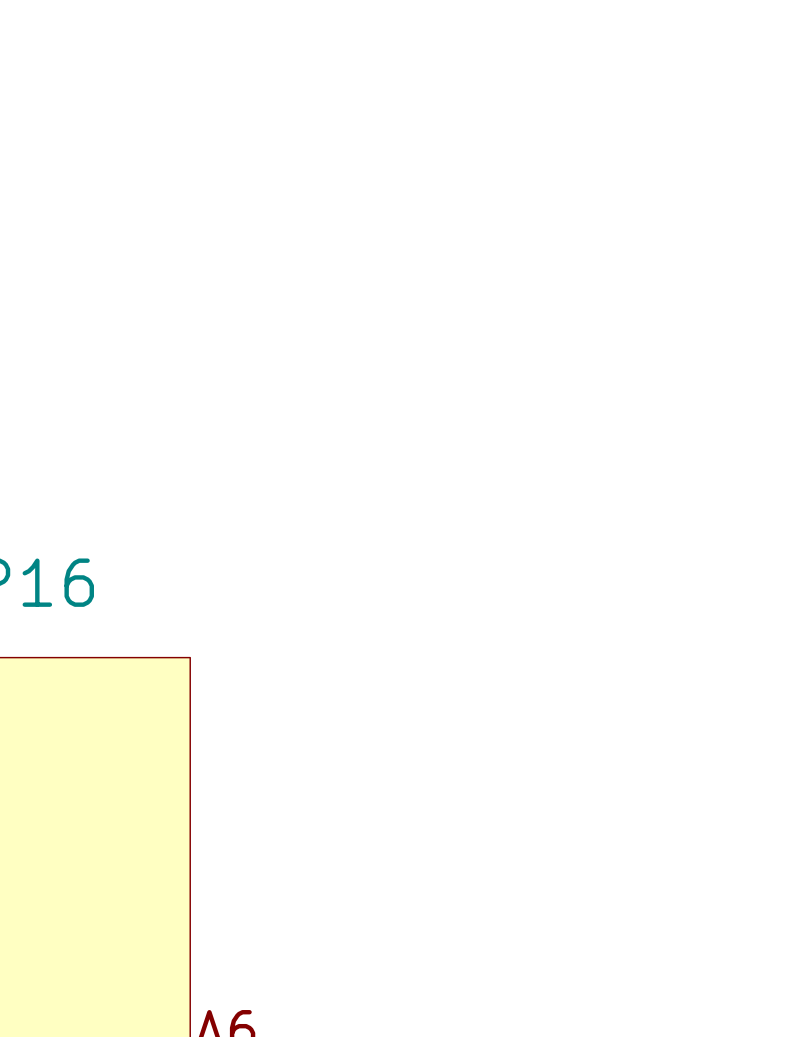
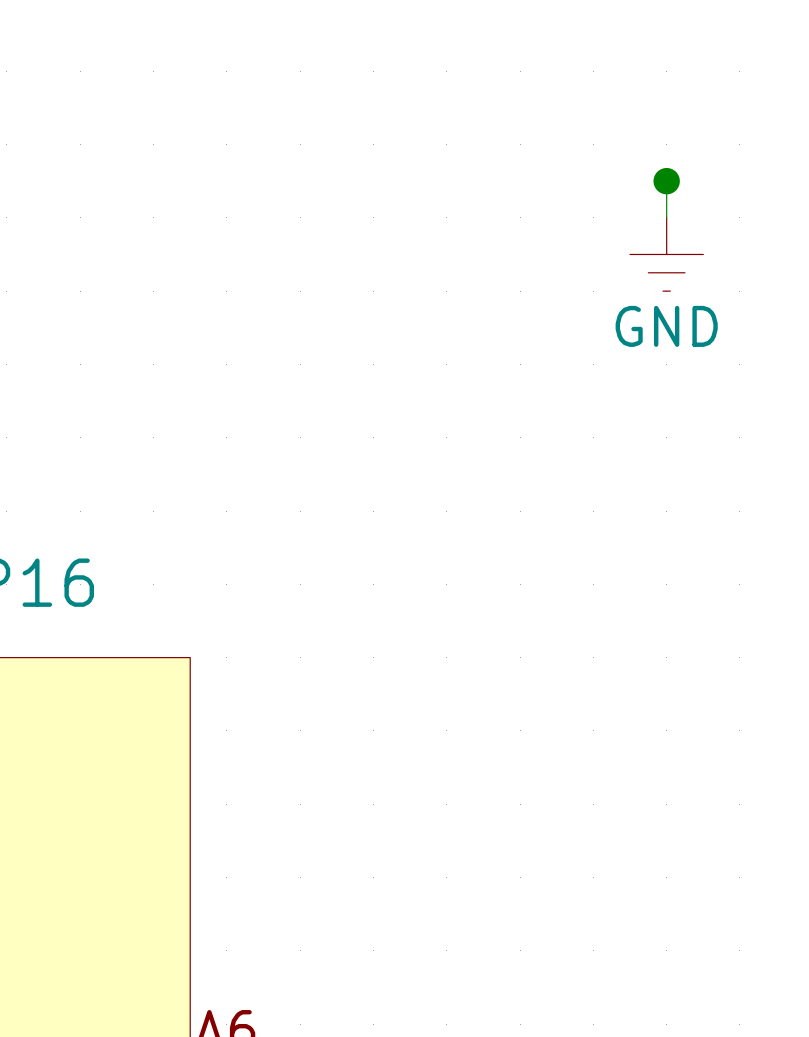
wire: none -> (666, 181) (666, 217)
junction: none -> (666, 181)
power symbol: none -> GND (666, 254)

